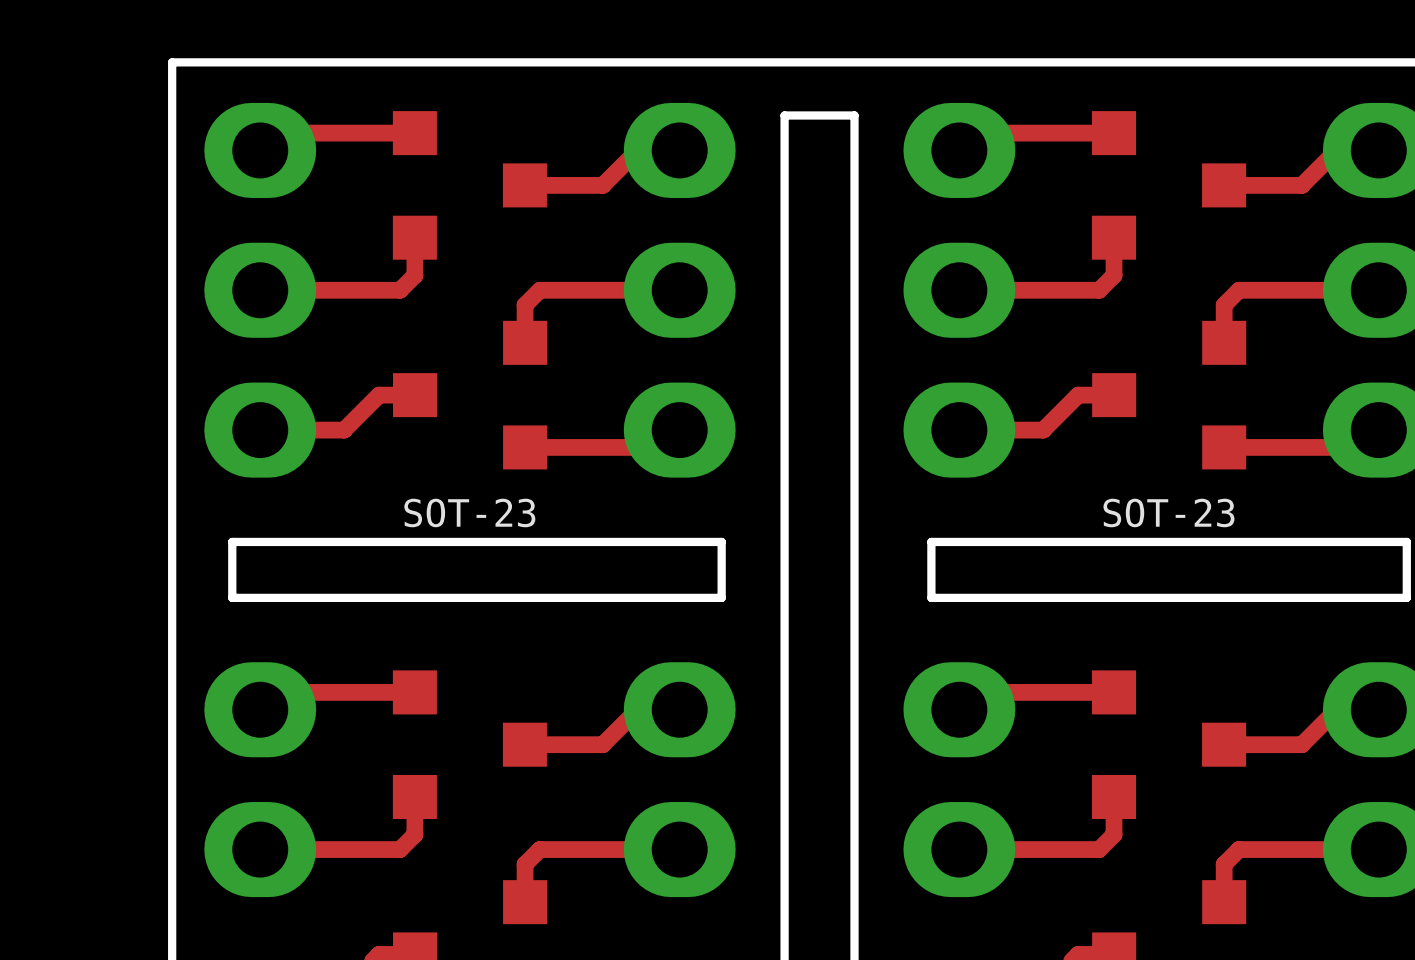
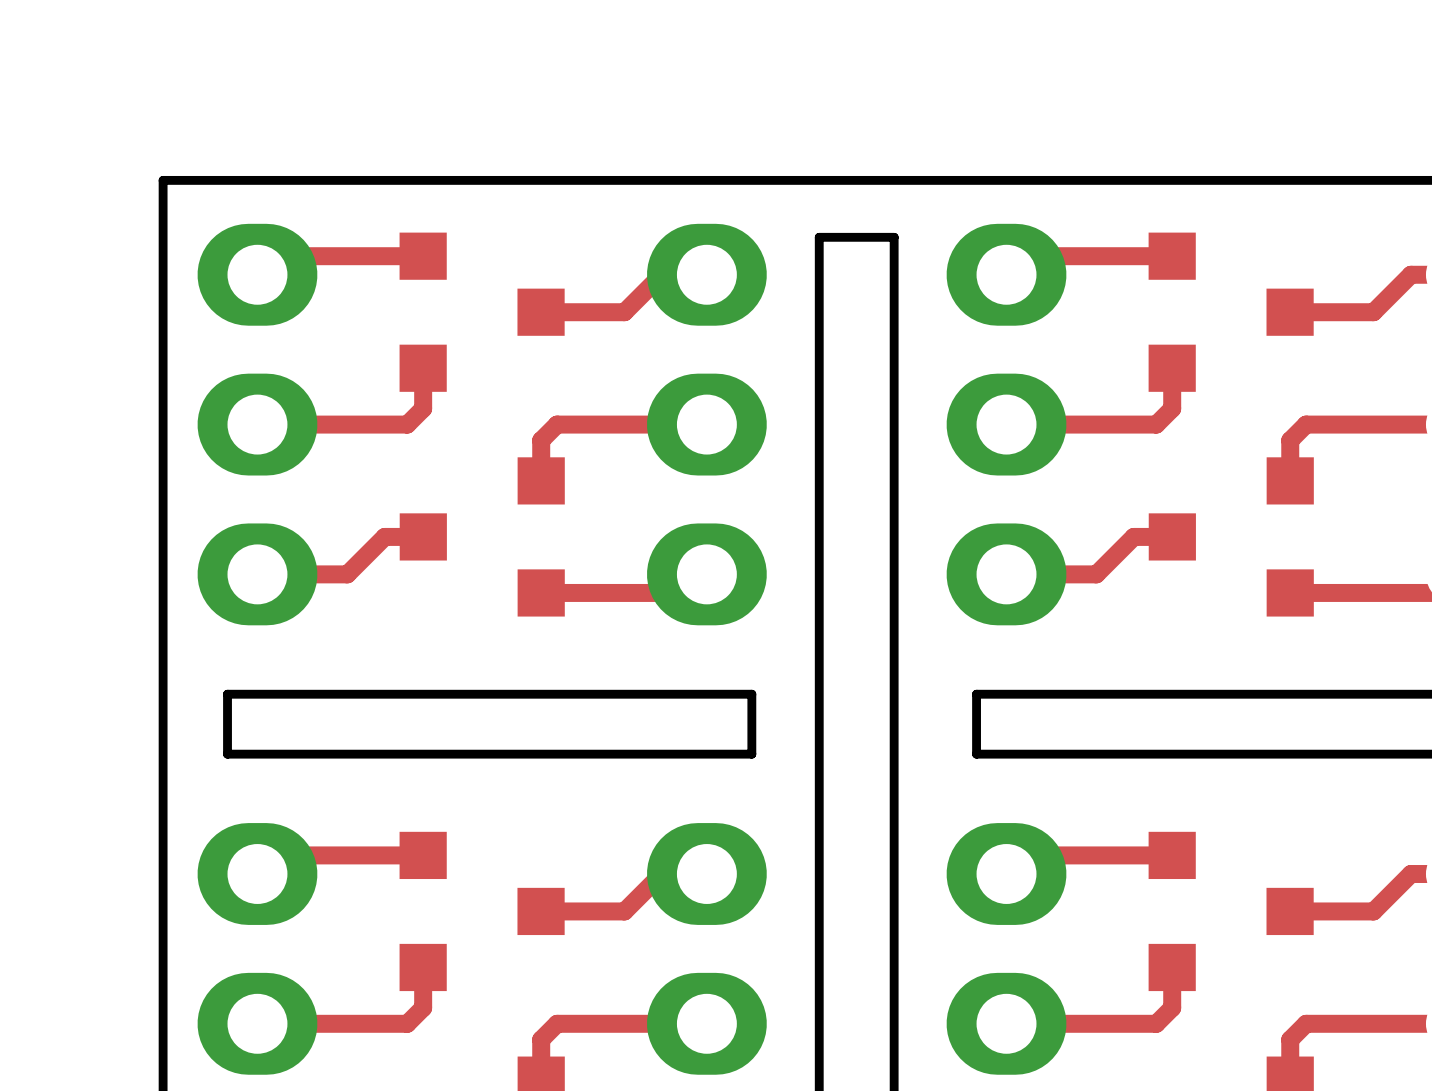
text: SOT-23 (469, 512) -> none
text: SOT-23 (1168, 512) -> none

